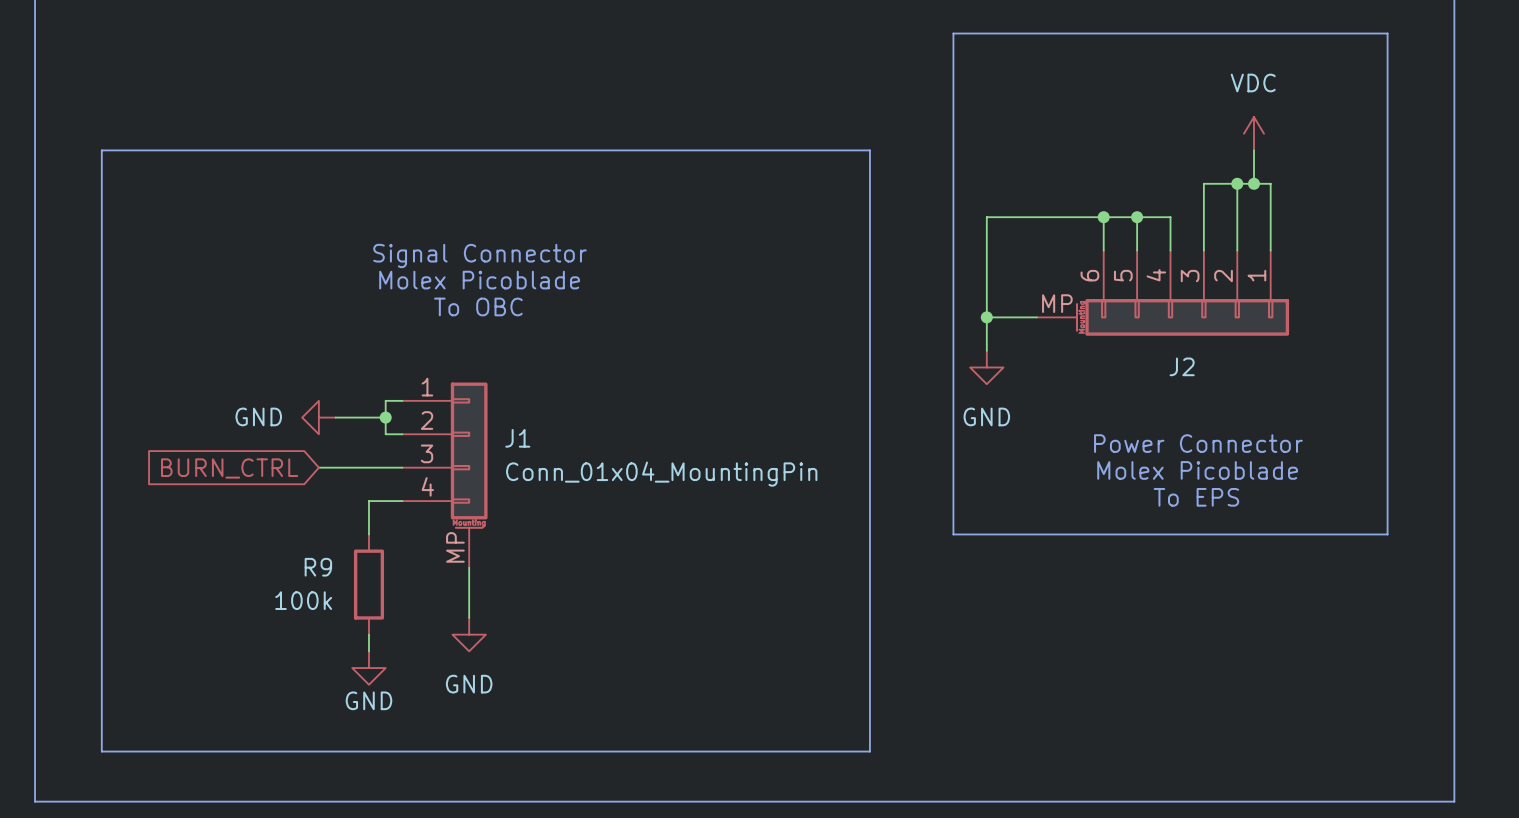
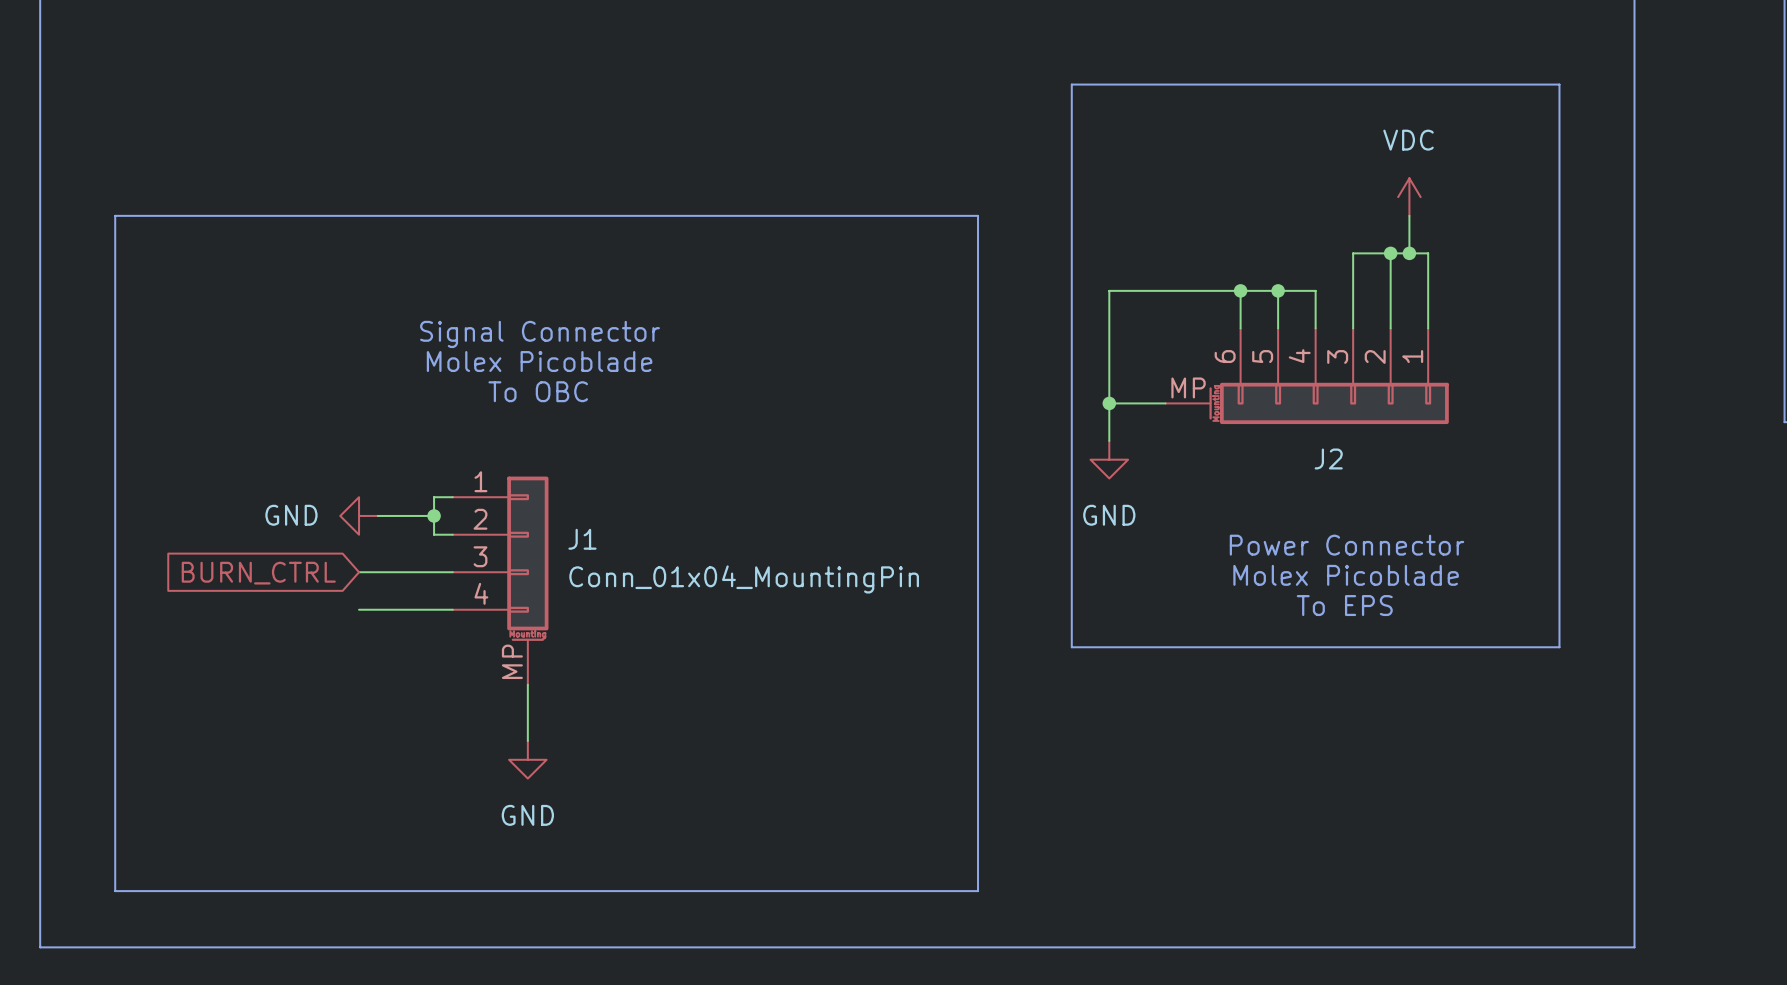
wire: (368, 501) (368, 534) -> (415, 609) (359, 609)
R9: 100k (368, 584) -> none
wire: (368, 634) (368, 651) -> none
power symbol: GND (368, 668) -> none

